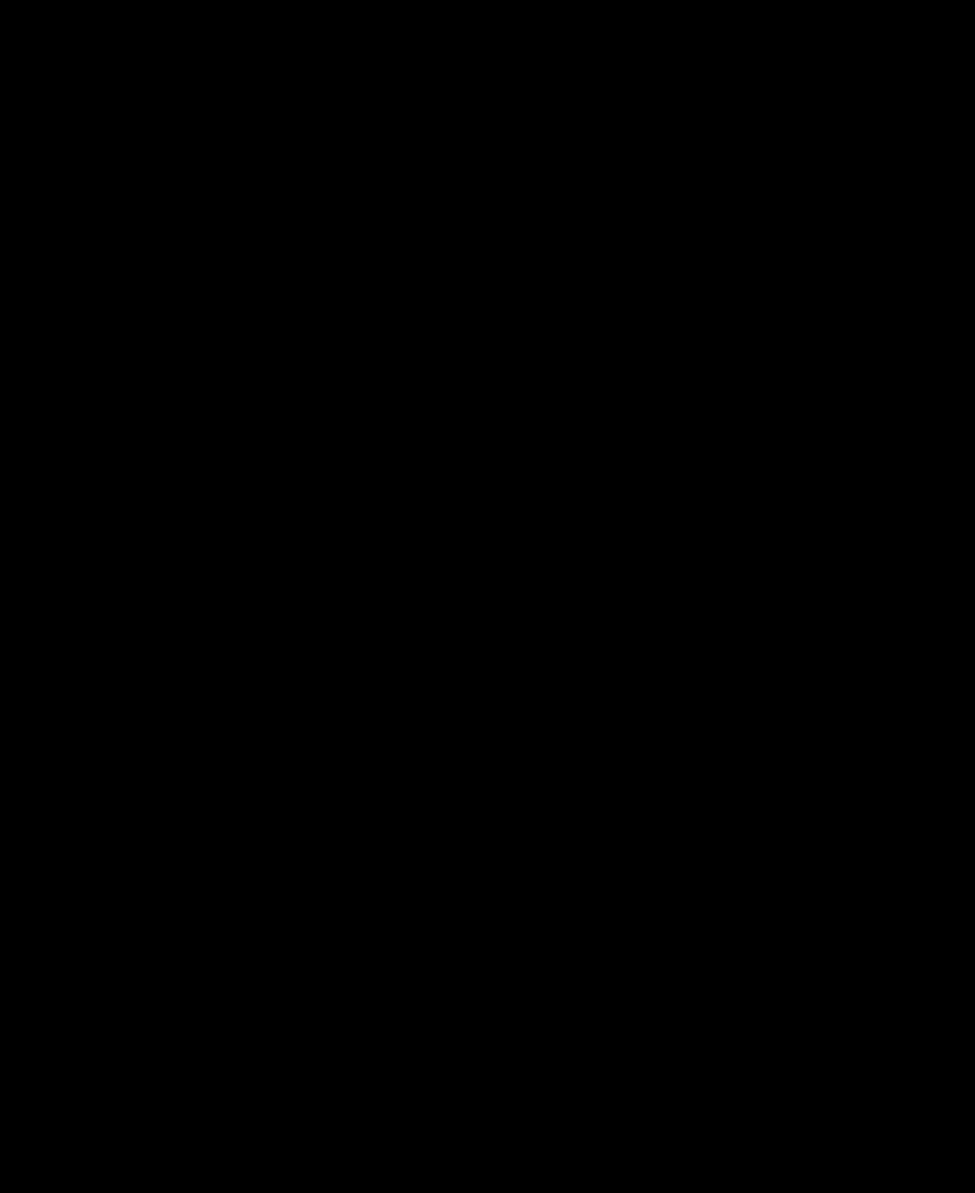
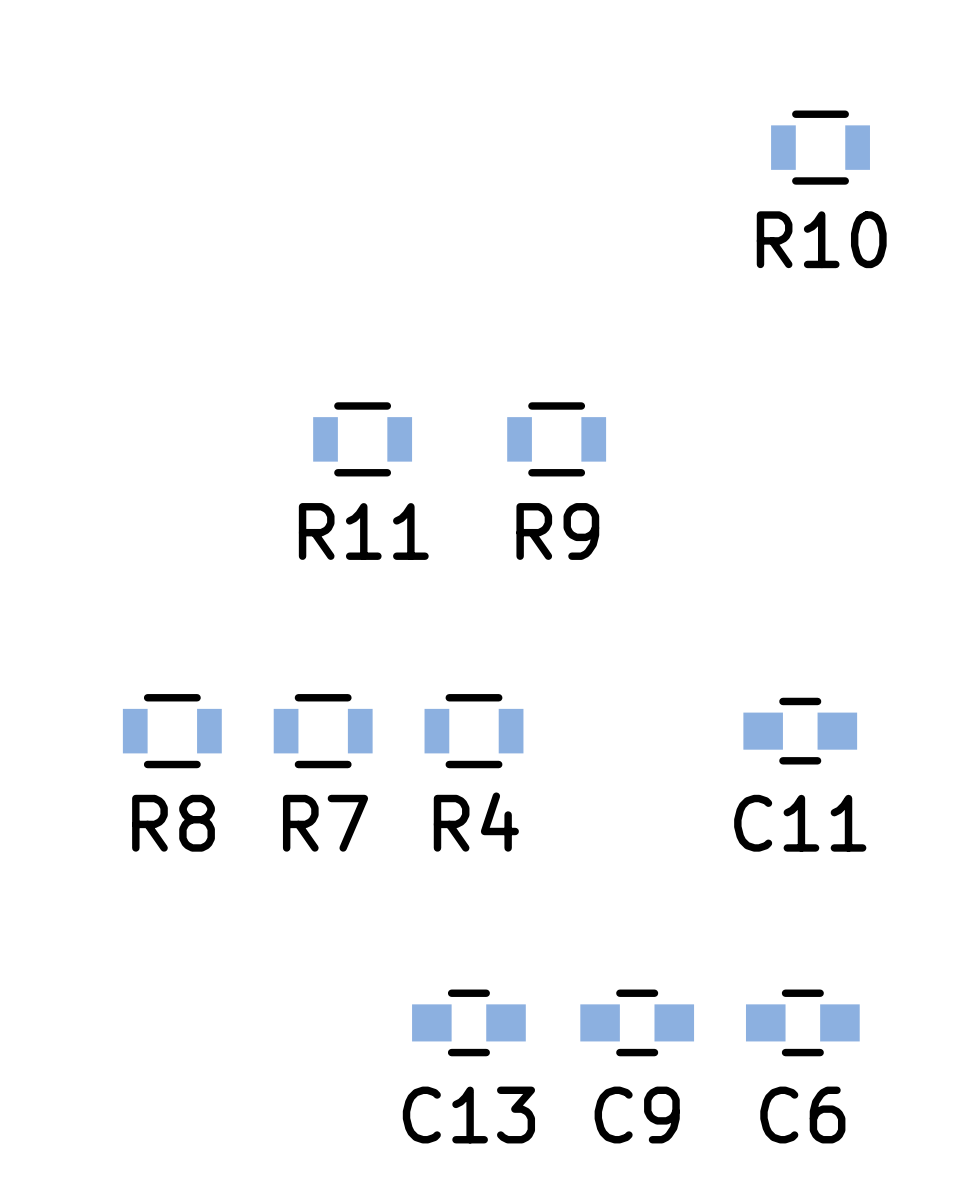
R10: none -> (820, 147)
R11: none -> (362, 439)
R9: none -> (556, 439)
R8: none -> (172, 731)
R7: none -> (323, 731)
R4: none -> (473, 731)
C11: none -> (800, 731)
C13: none -> (468, 1022)
C9: none -> (637, 1022)
C6: none -> (802, 1022)

